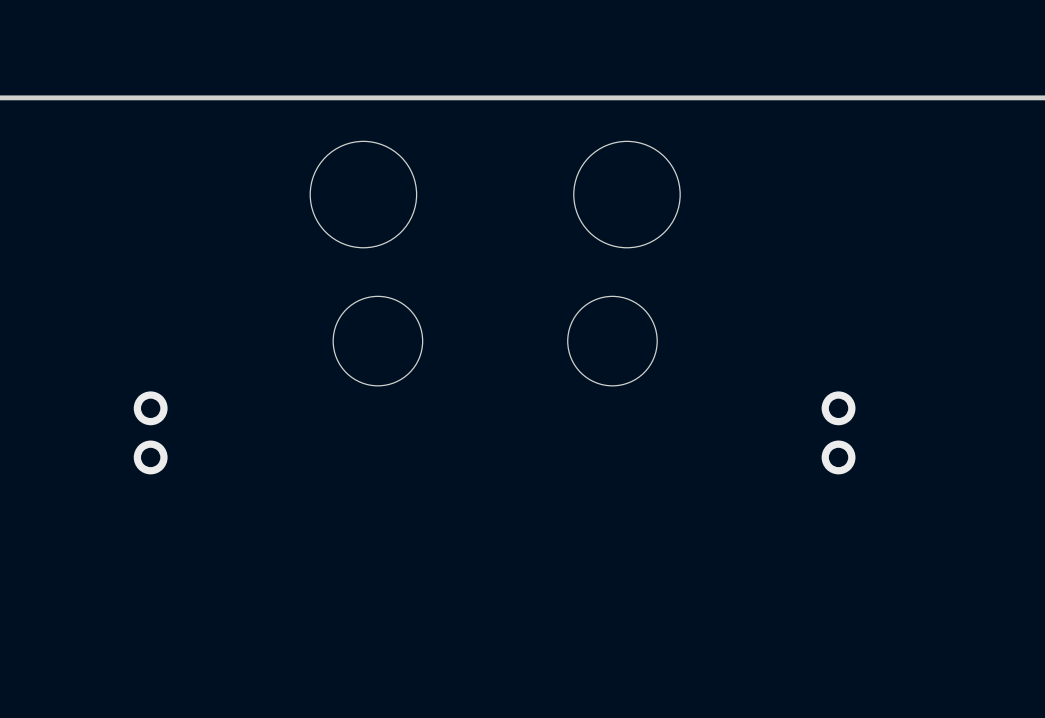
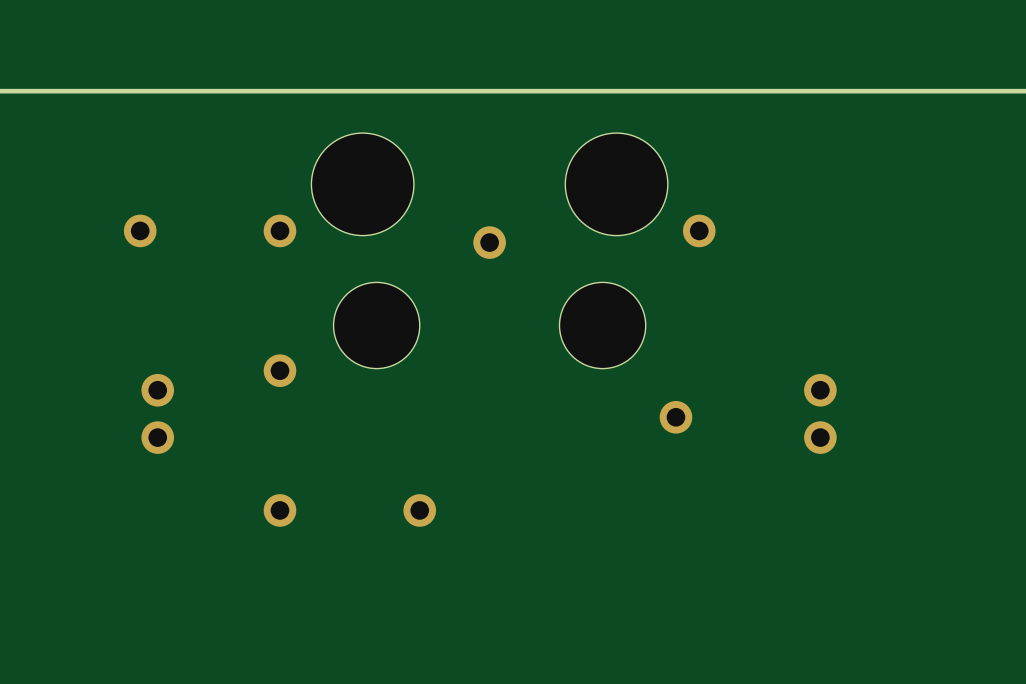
via: none -> (140, 230)
via: none -> (279, 230)
via: none -> (699, 230)
via: none -> (489, 242)
via: none -> (279, 370)
via: none -> (675, 417)
via: none -> (279, 510)
via: none -> (419, 510)

